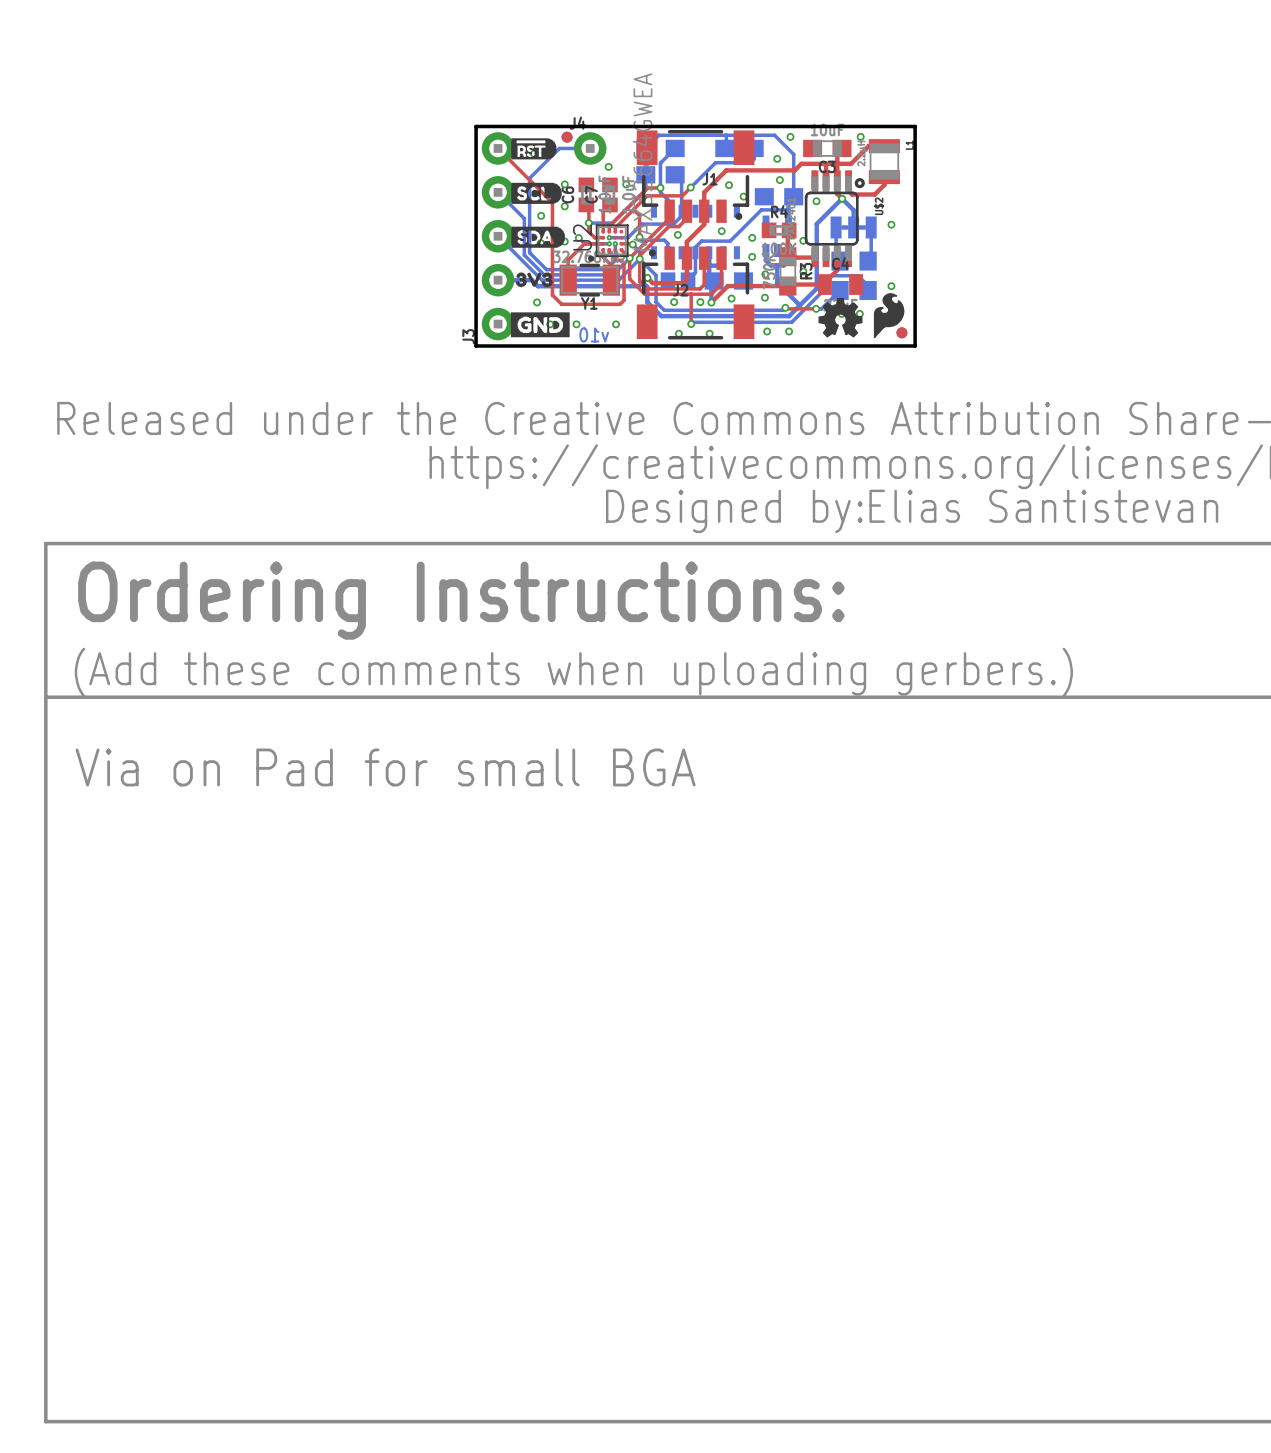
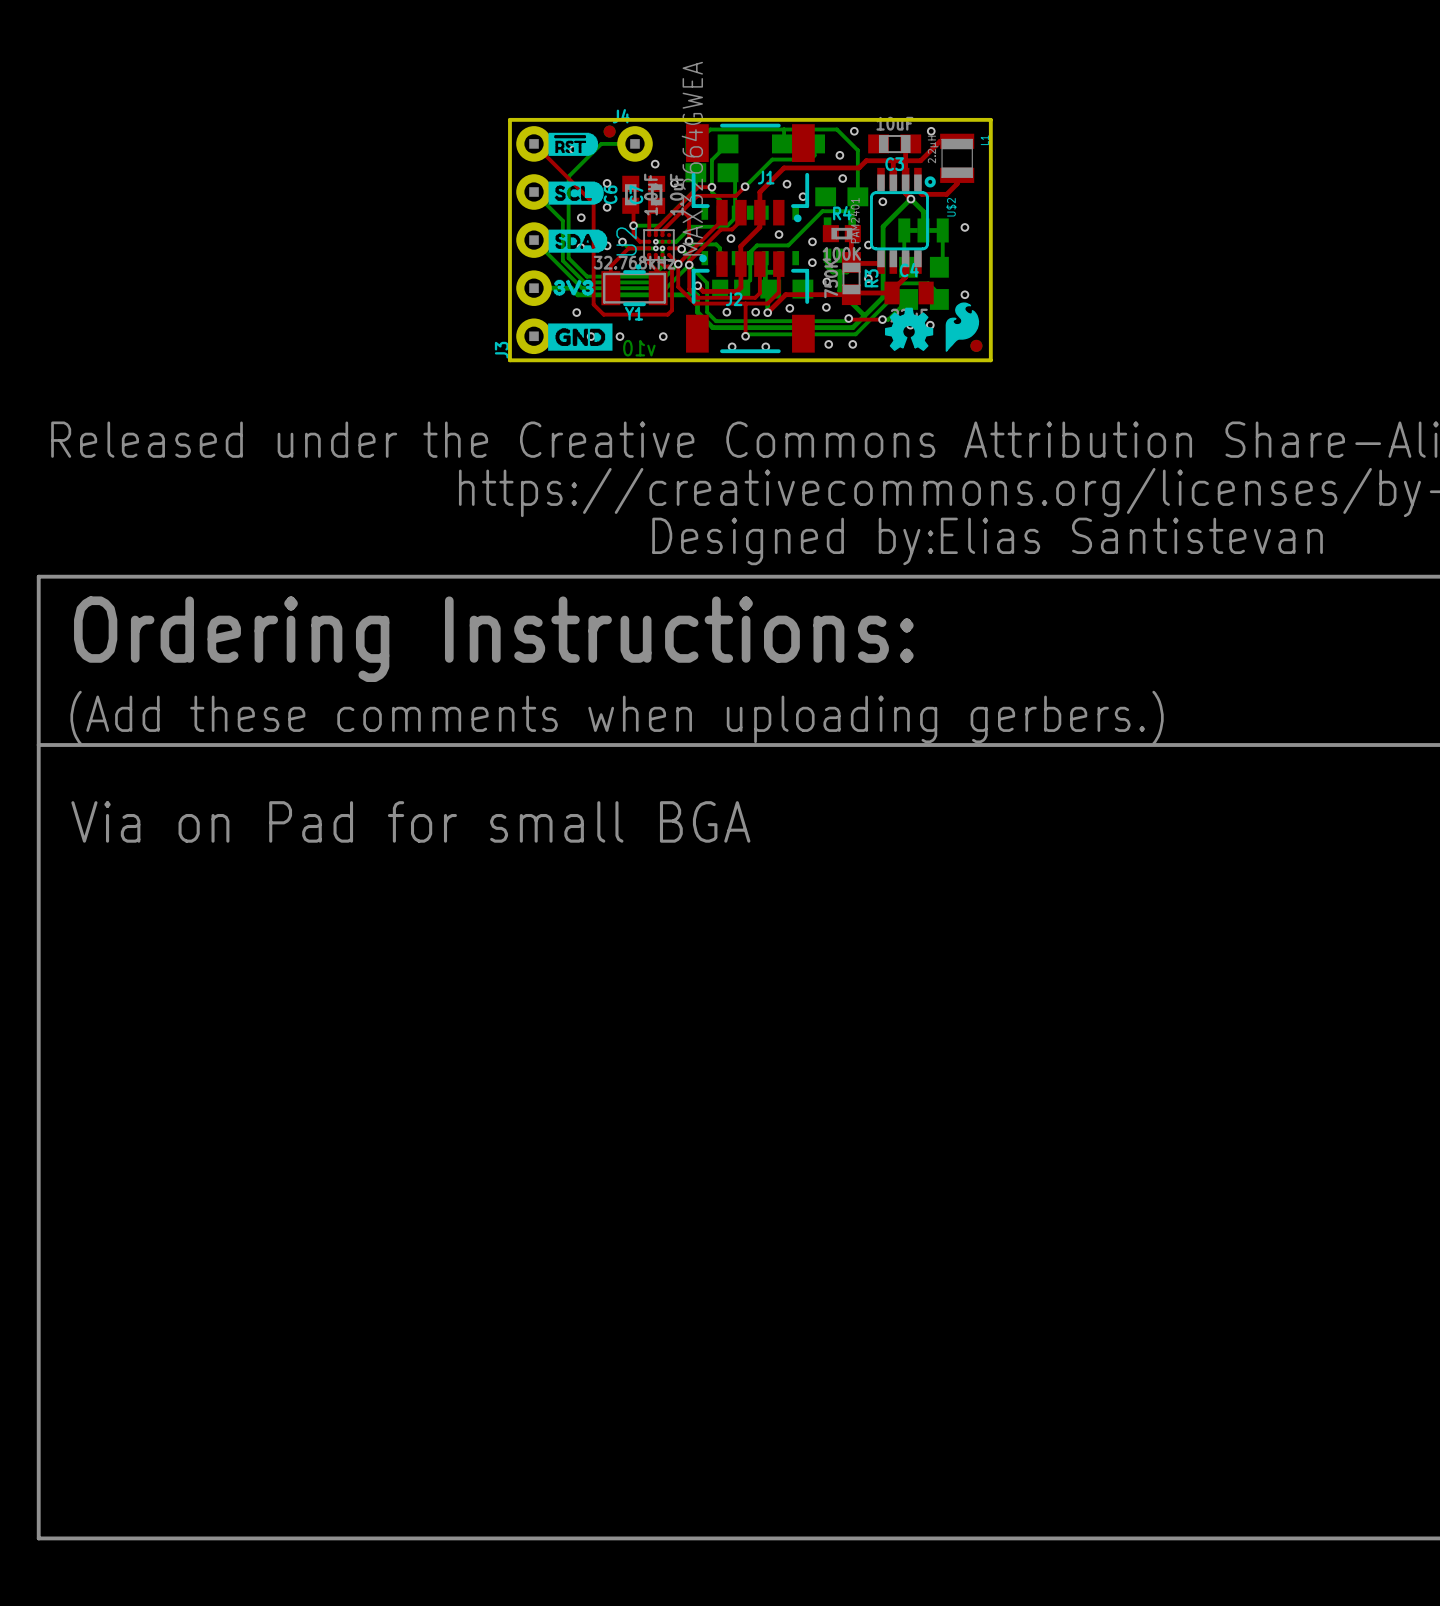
U2 footprint: [588, 224, 629, 262] -> [635, 229, 675, 270]

